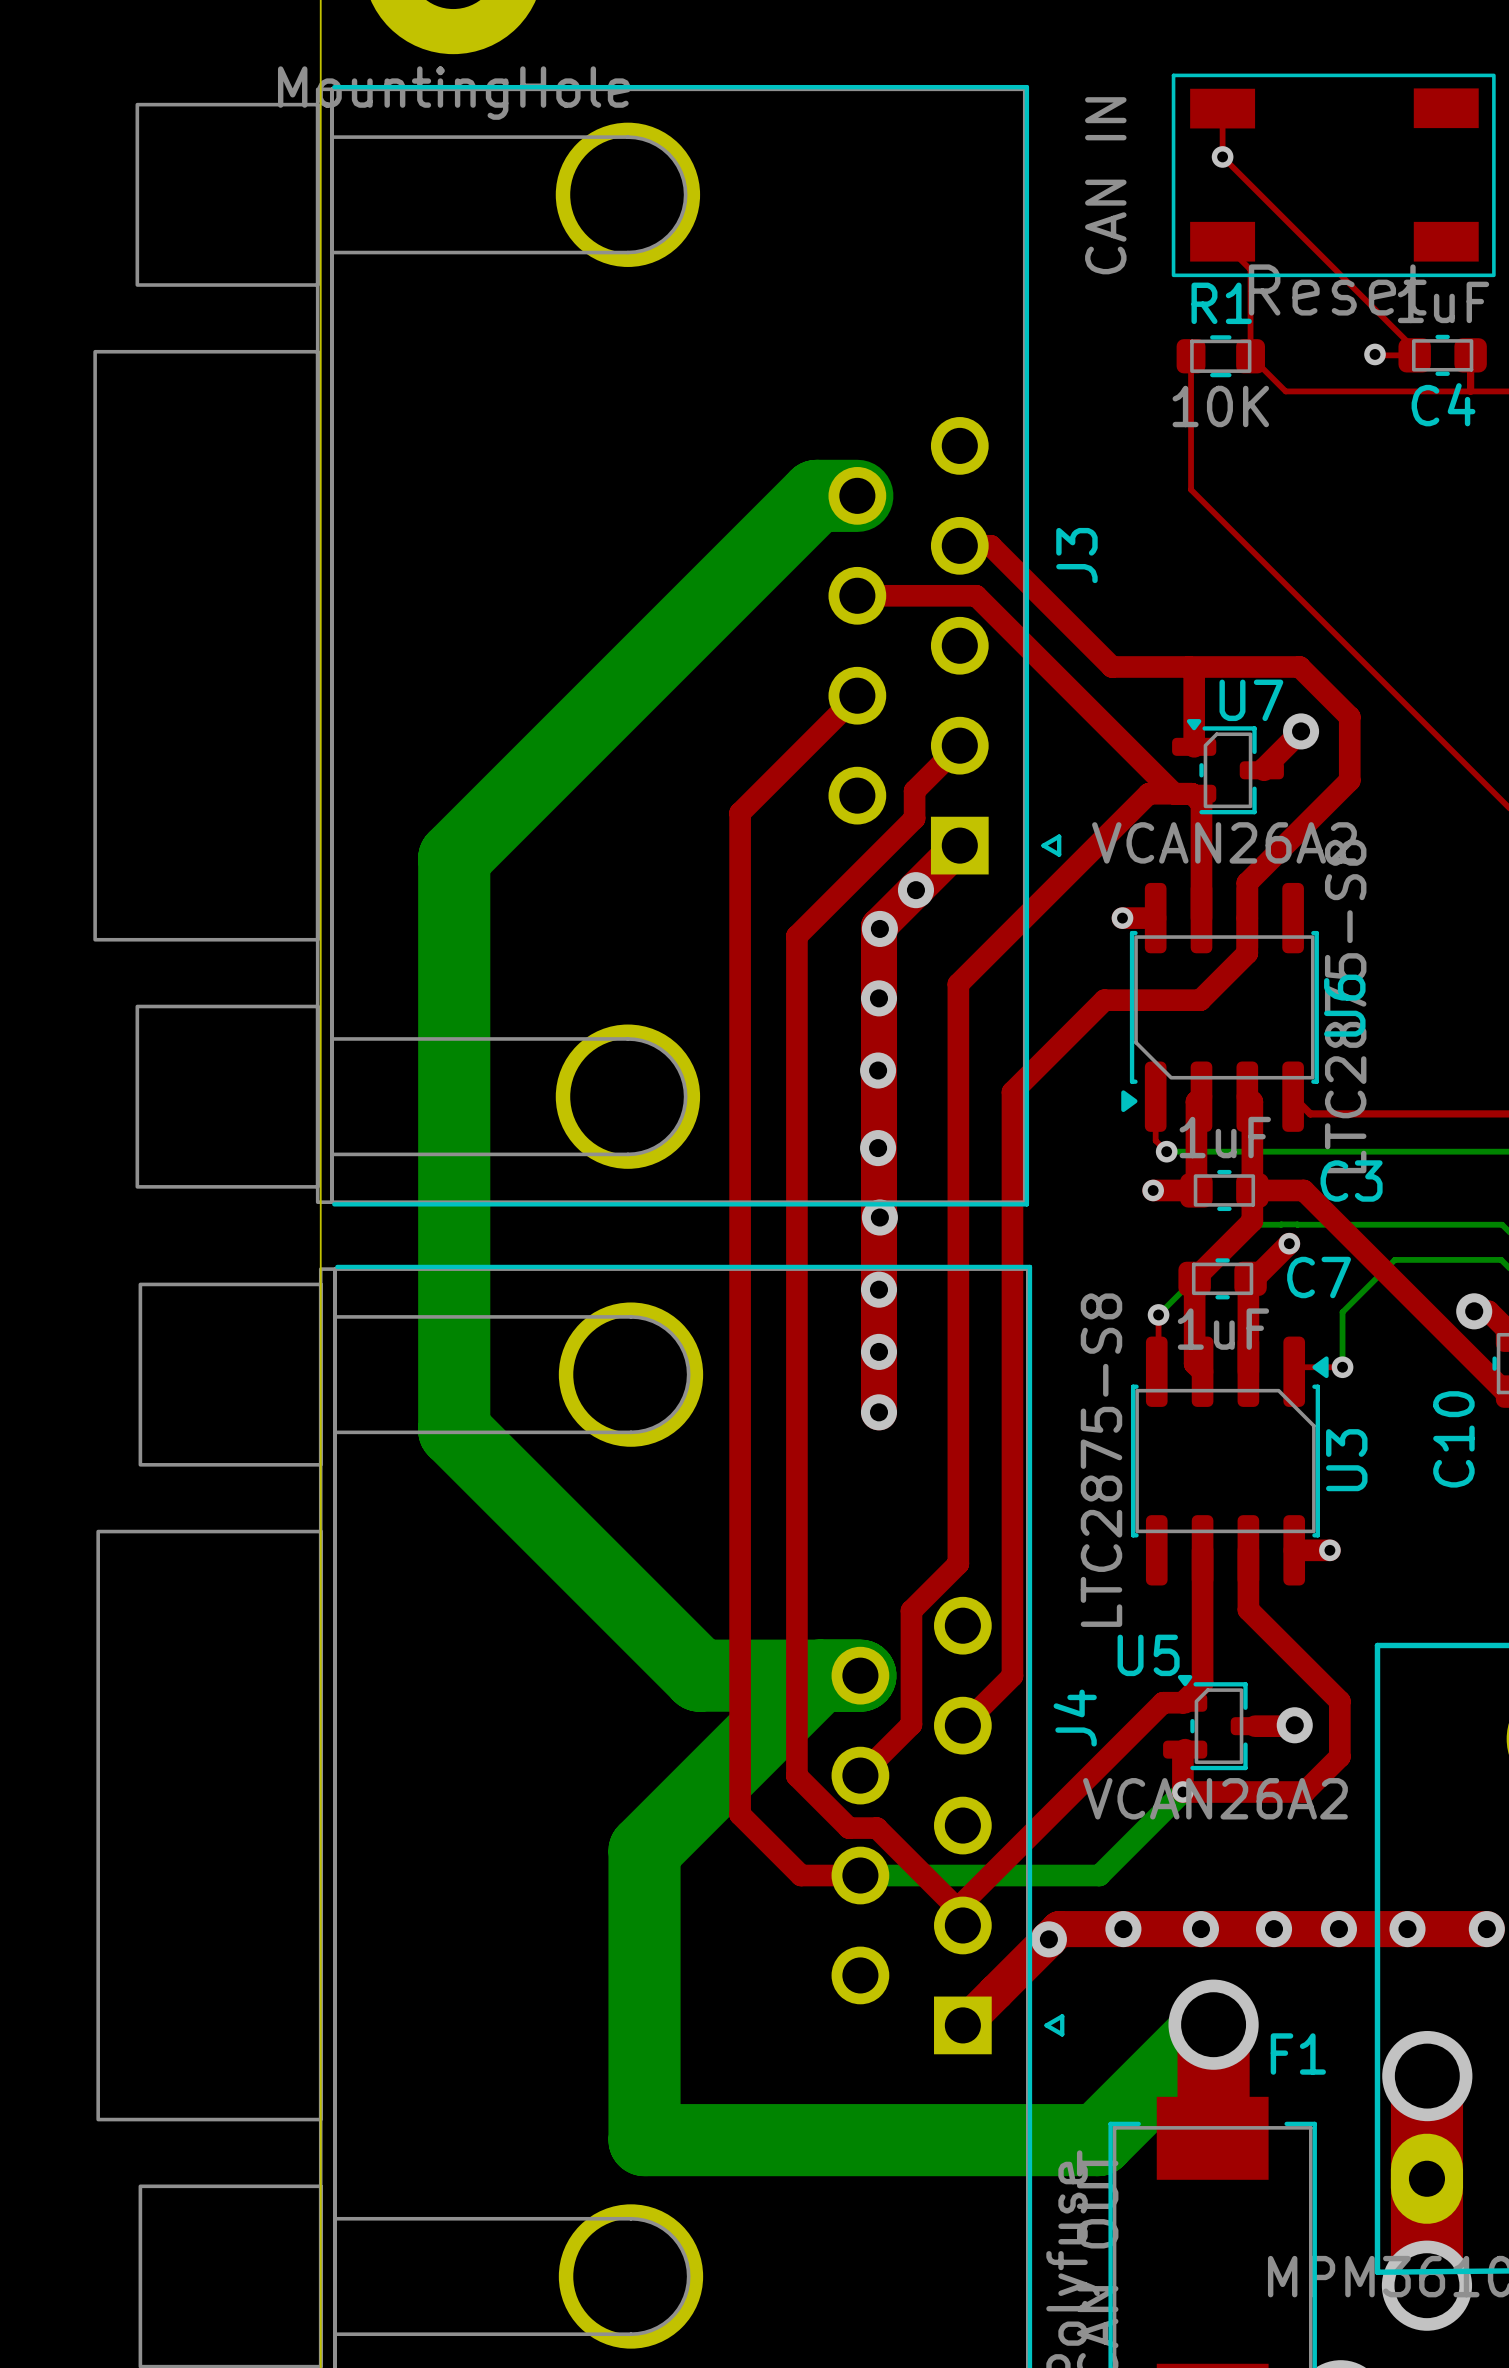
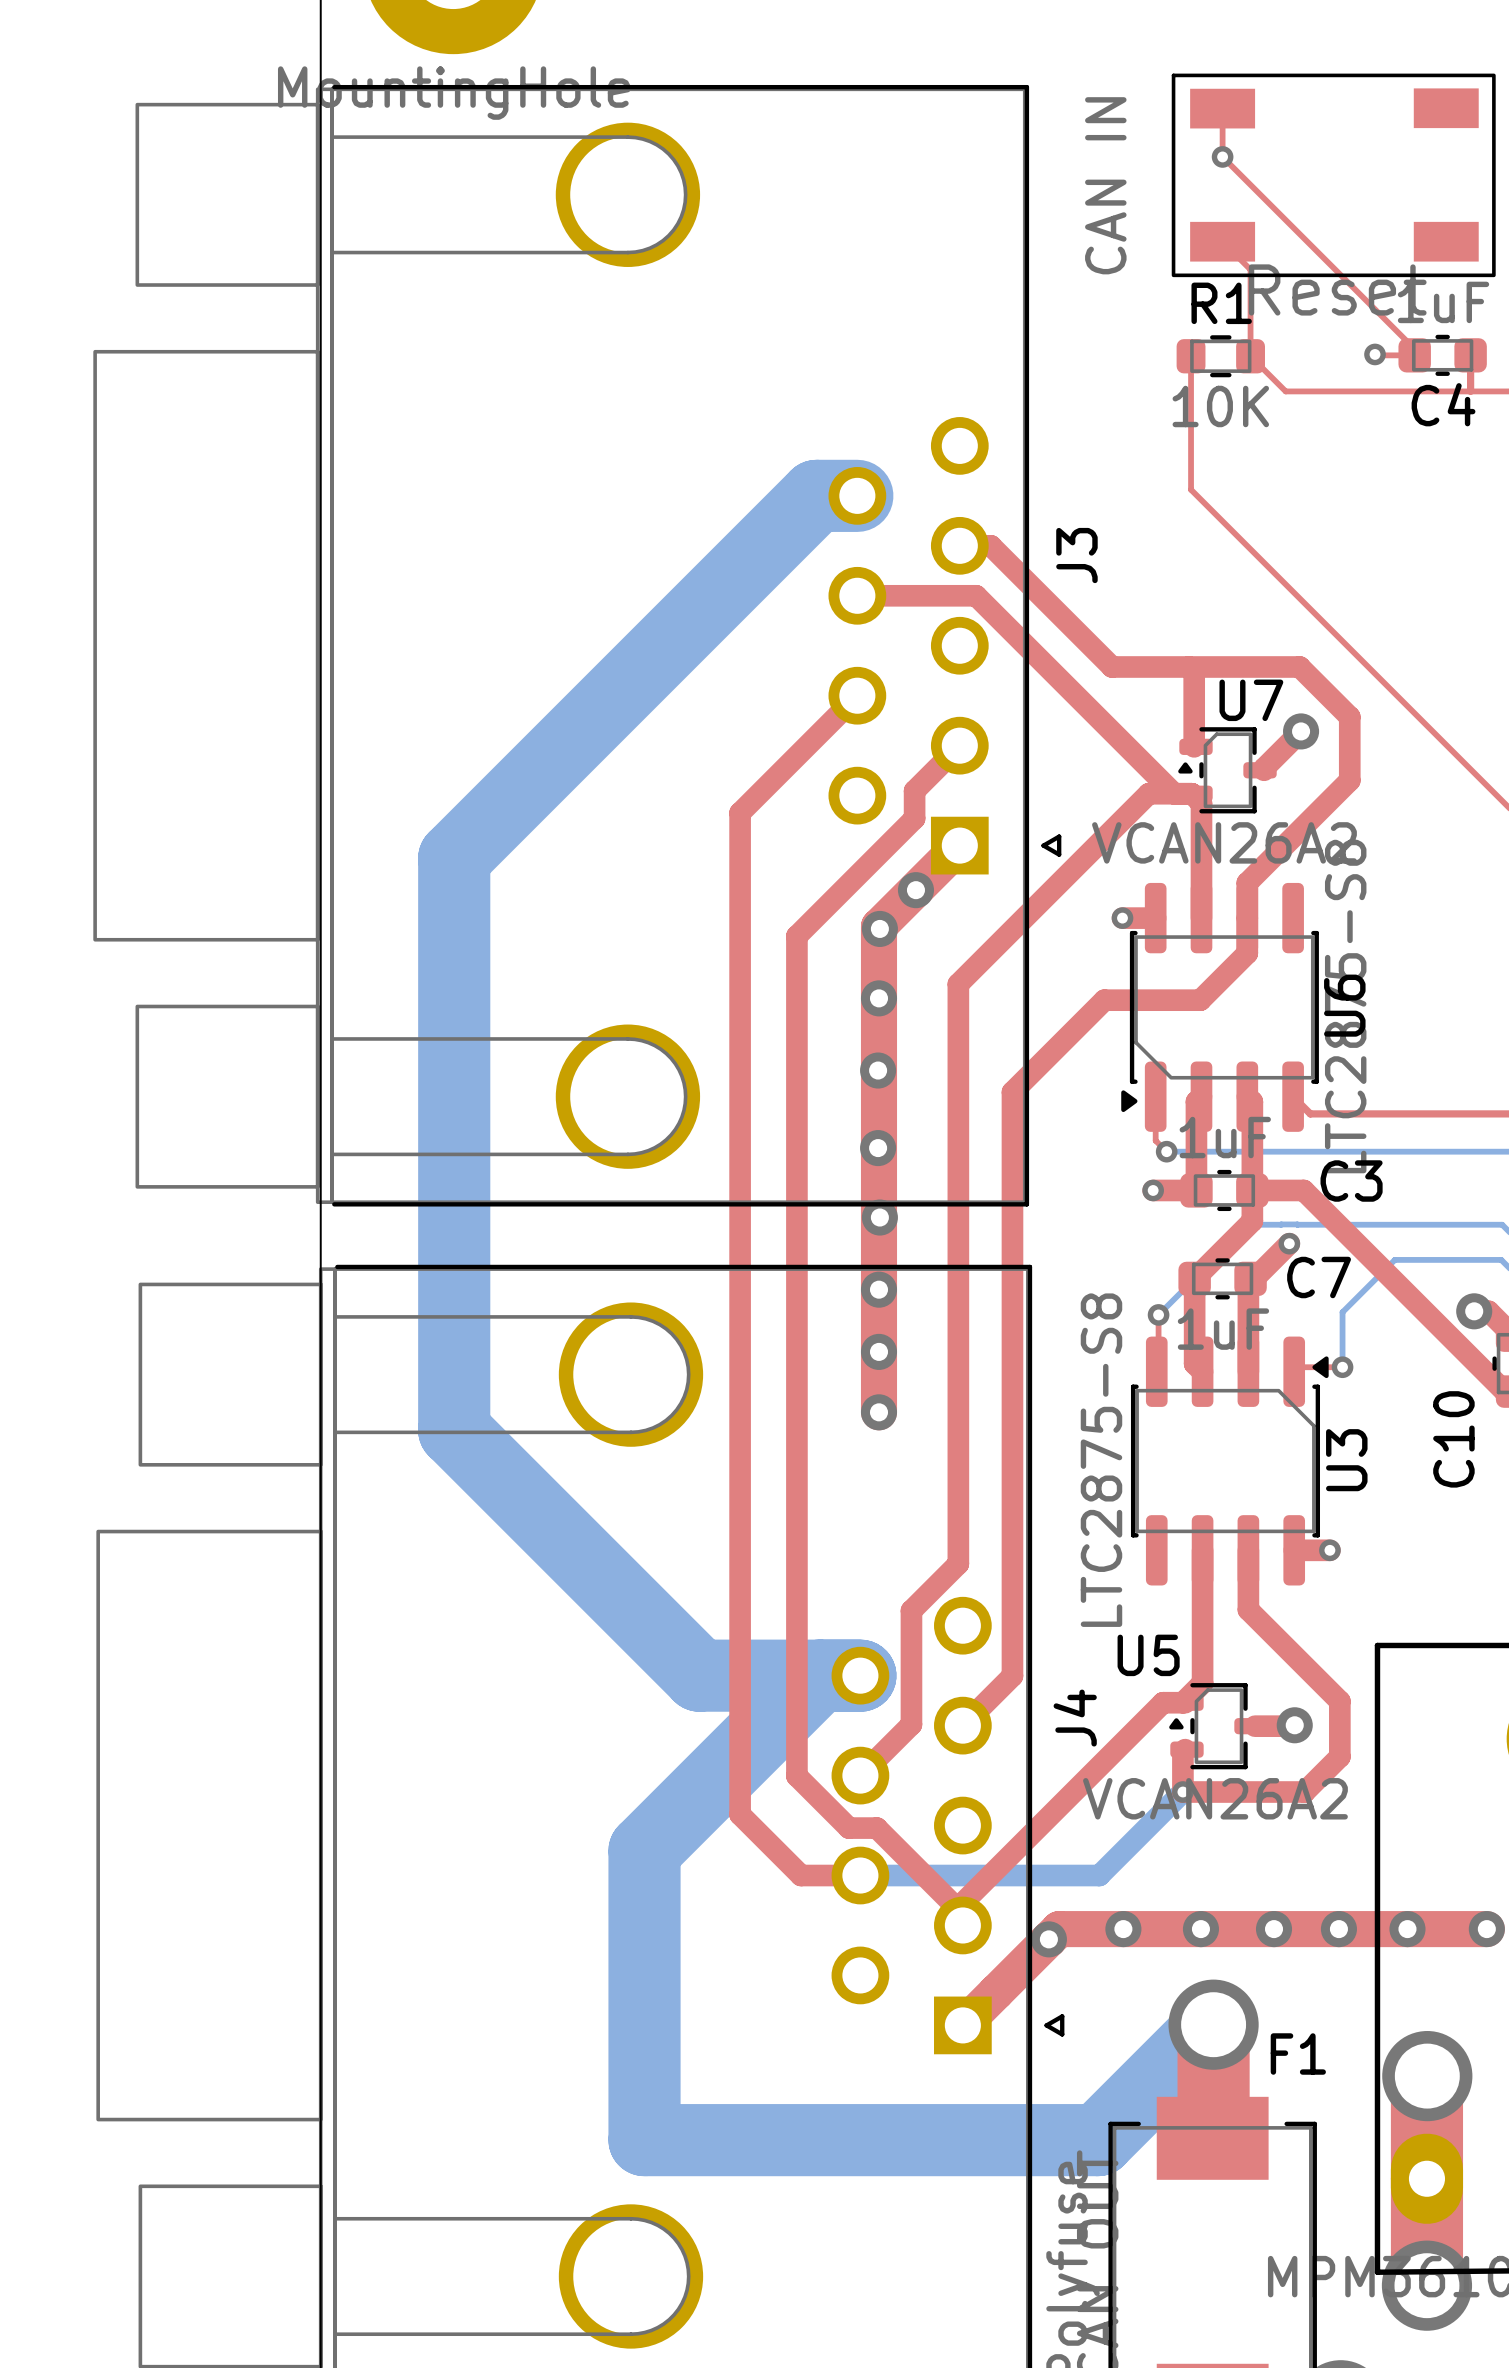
U7 footprint: [1172, 719, 1284, 815] -> [1178, 727, 1277, 814]
U5 footprint: [1163, 1674, 1275, 1771] -> [1169, 1683, 1268, 1770]

